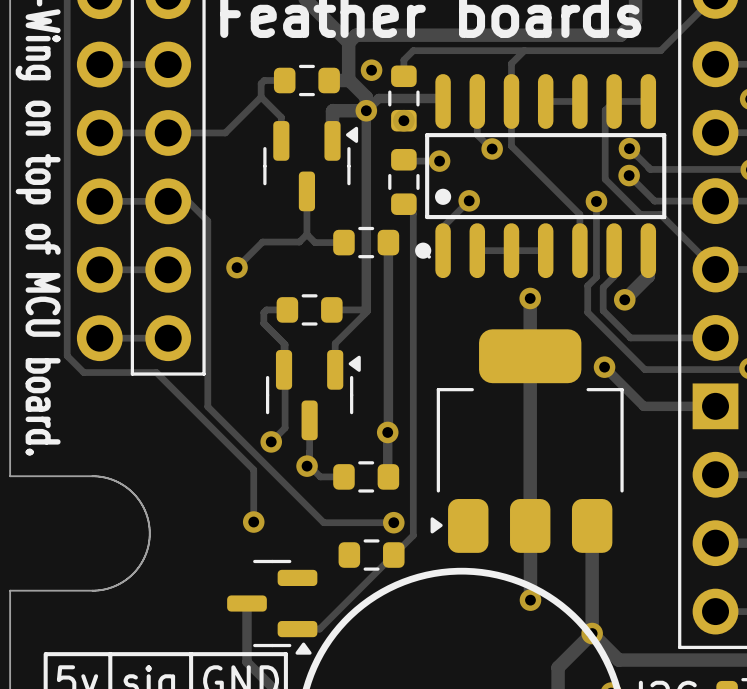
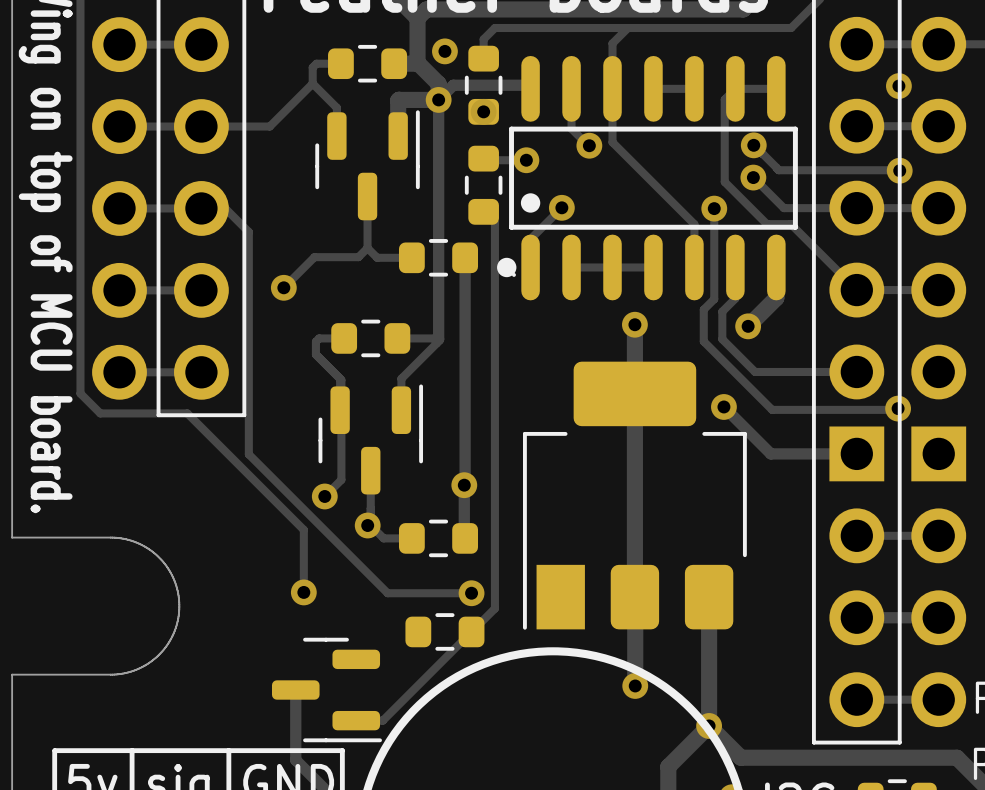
part footprint: [263, 121, 359, 212] -> [315, 110, 420, 221]
part footprint: [430, 329, 624, 553] -> [523, 361, 747, 630]
part footprint: [265, 349, 361, 441] -> [318, 384, 424, 495]
part footprint: [227, 559, 318, 655] -> [271, 637, 382, 743]

